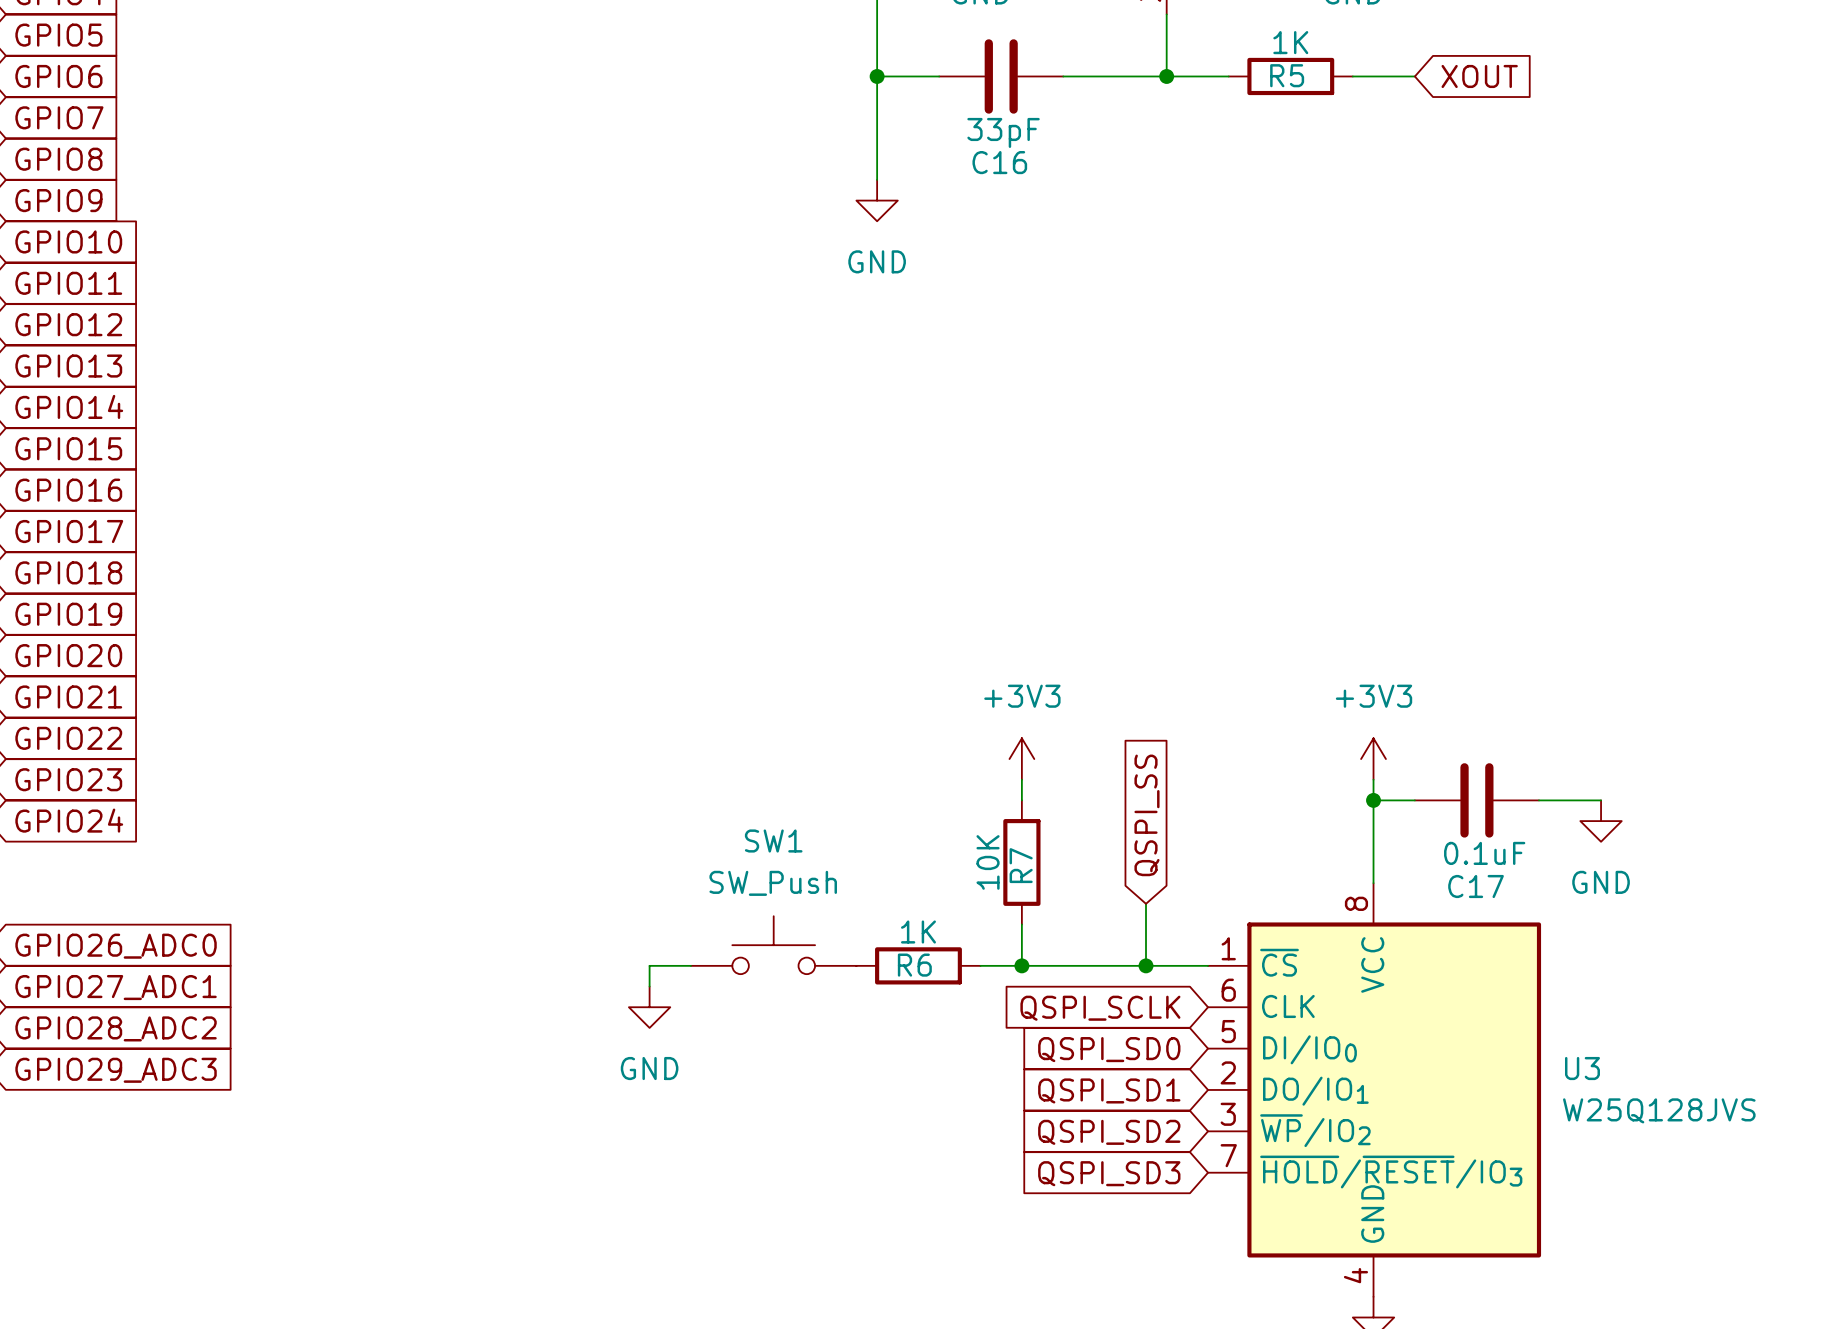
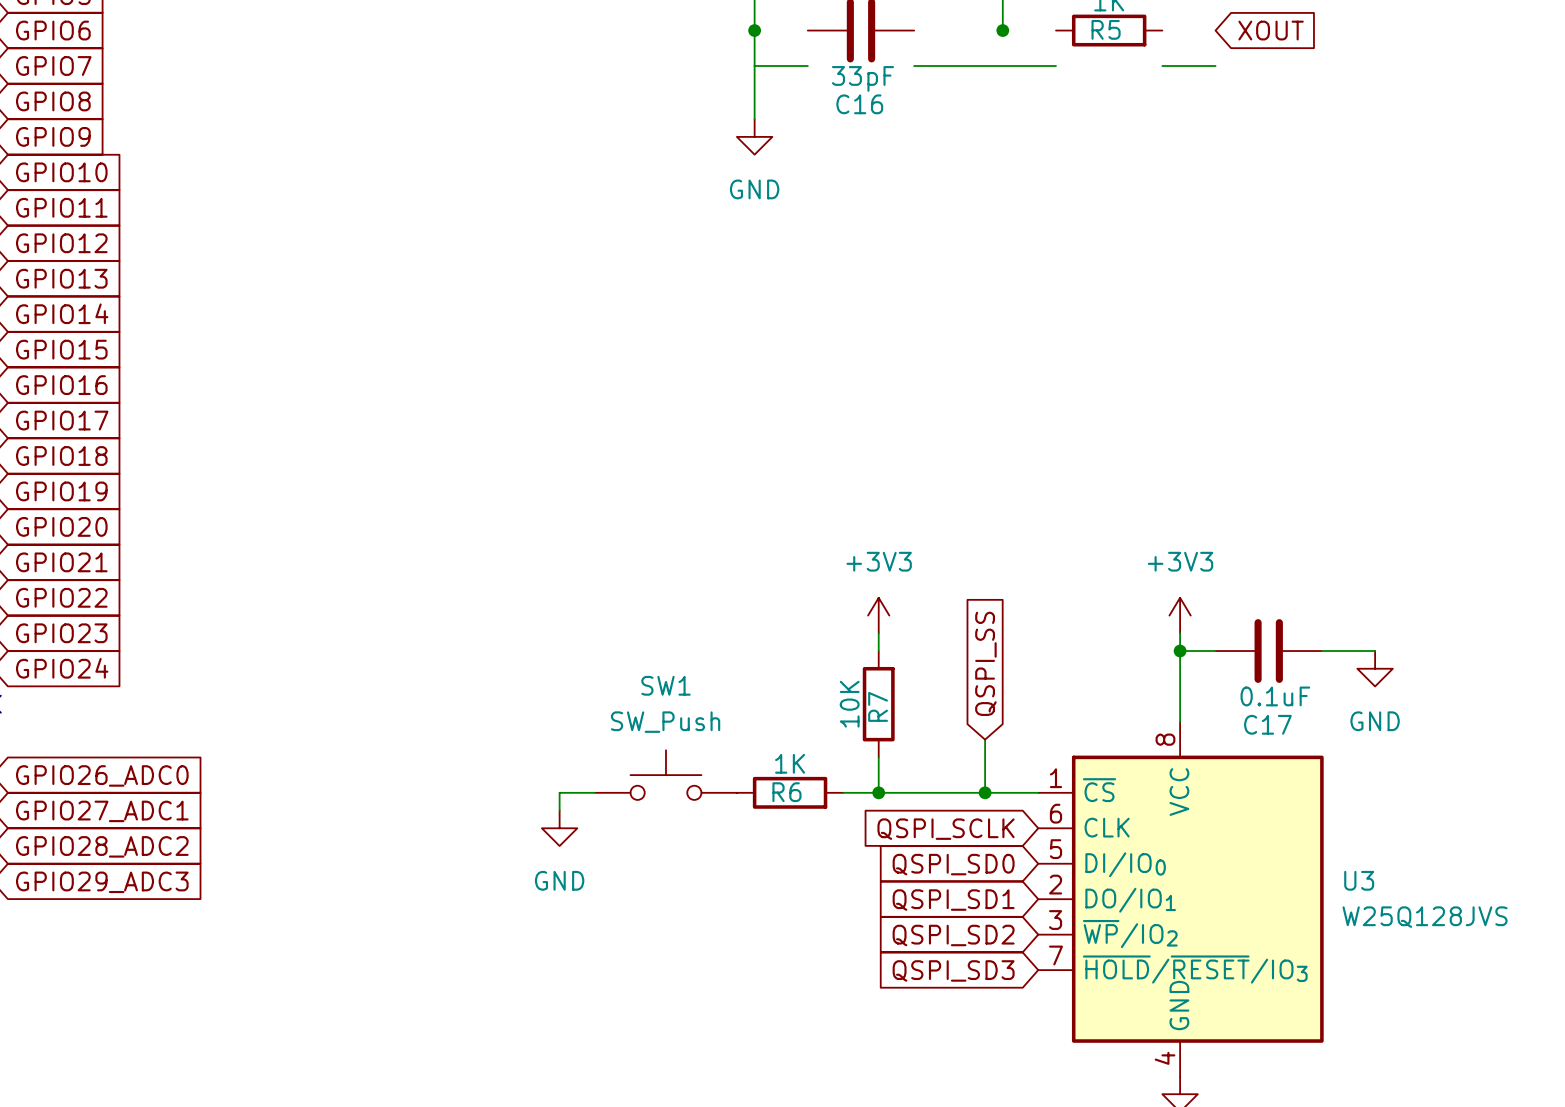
wire: (877, 76) (939, 76) -> (754, 66) (807, 66)
wire: (1063, 76) (1228, 76) -> (914, 66) (1055, 66)
wire: (1352, 76) (1414, 76) -> (1162, 66) (1215, 66)

